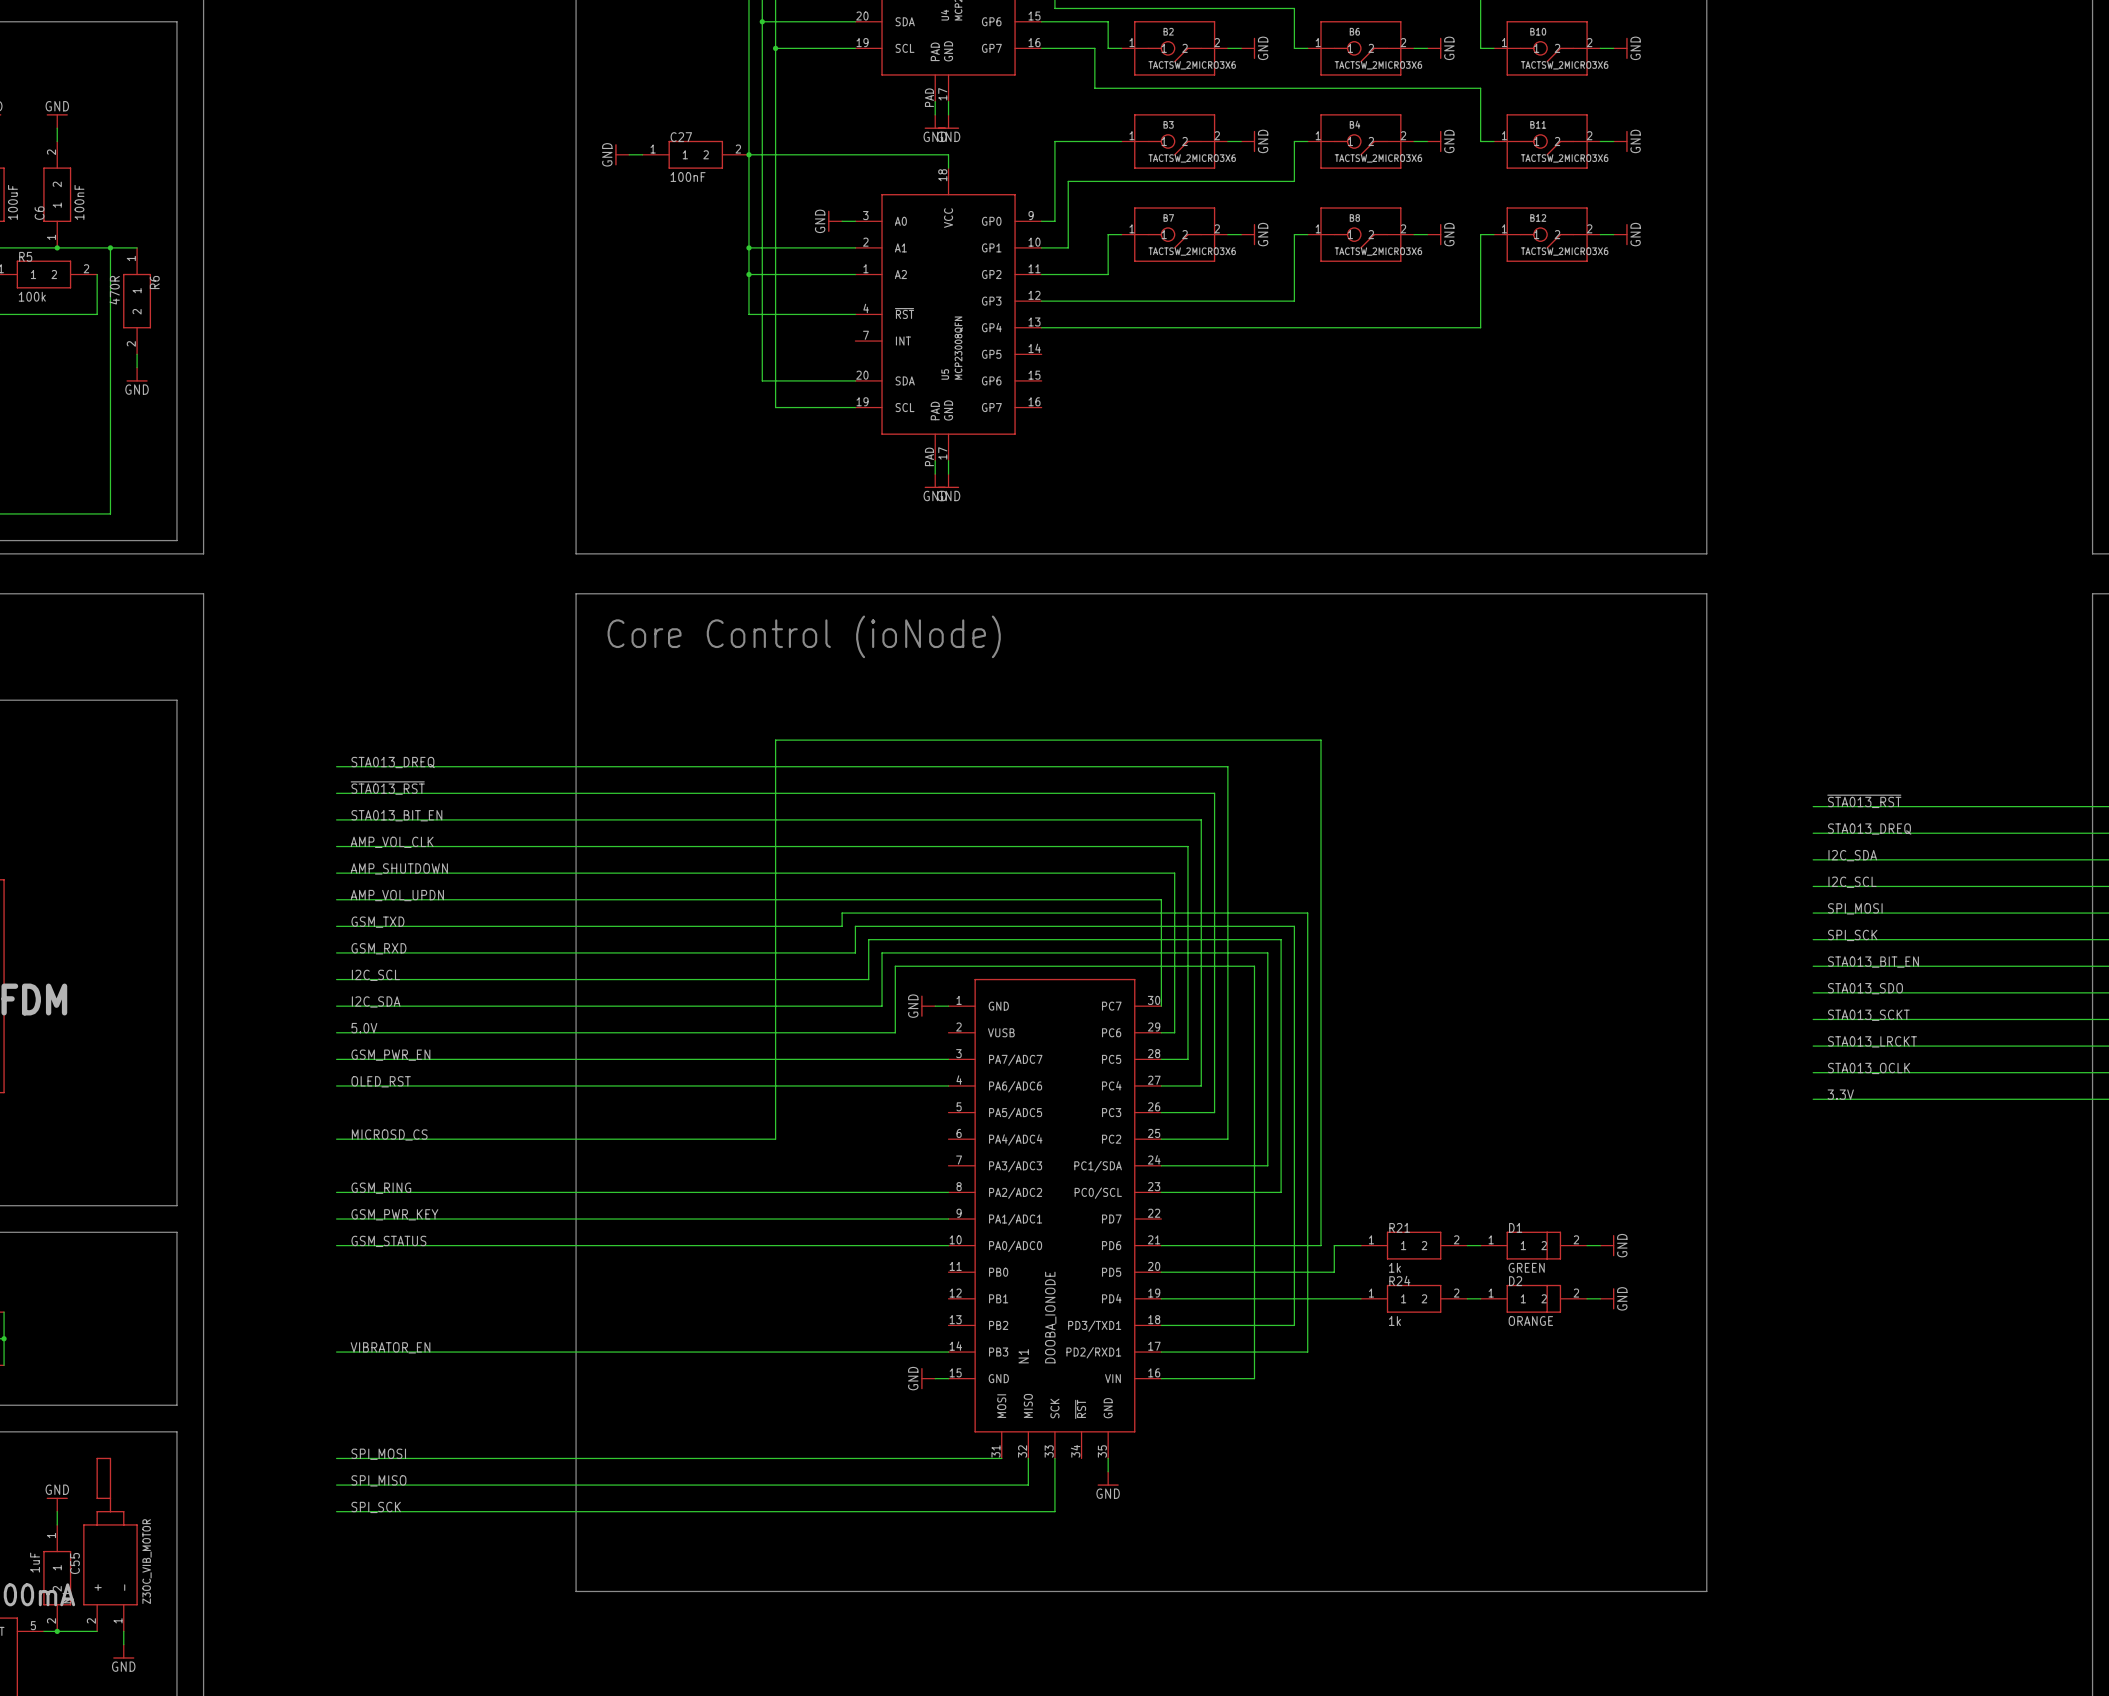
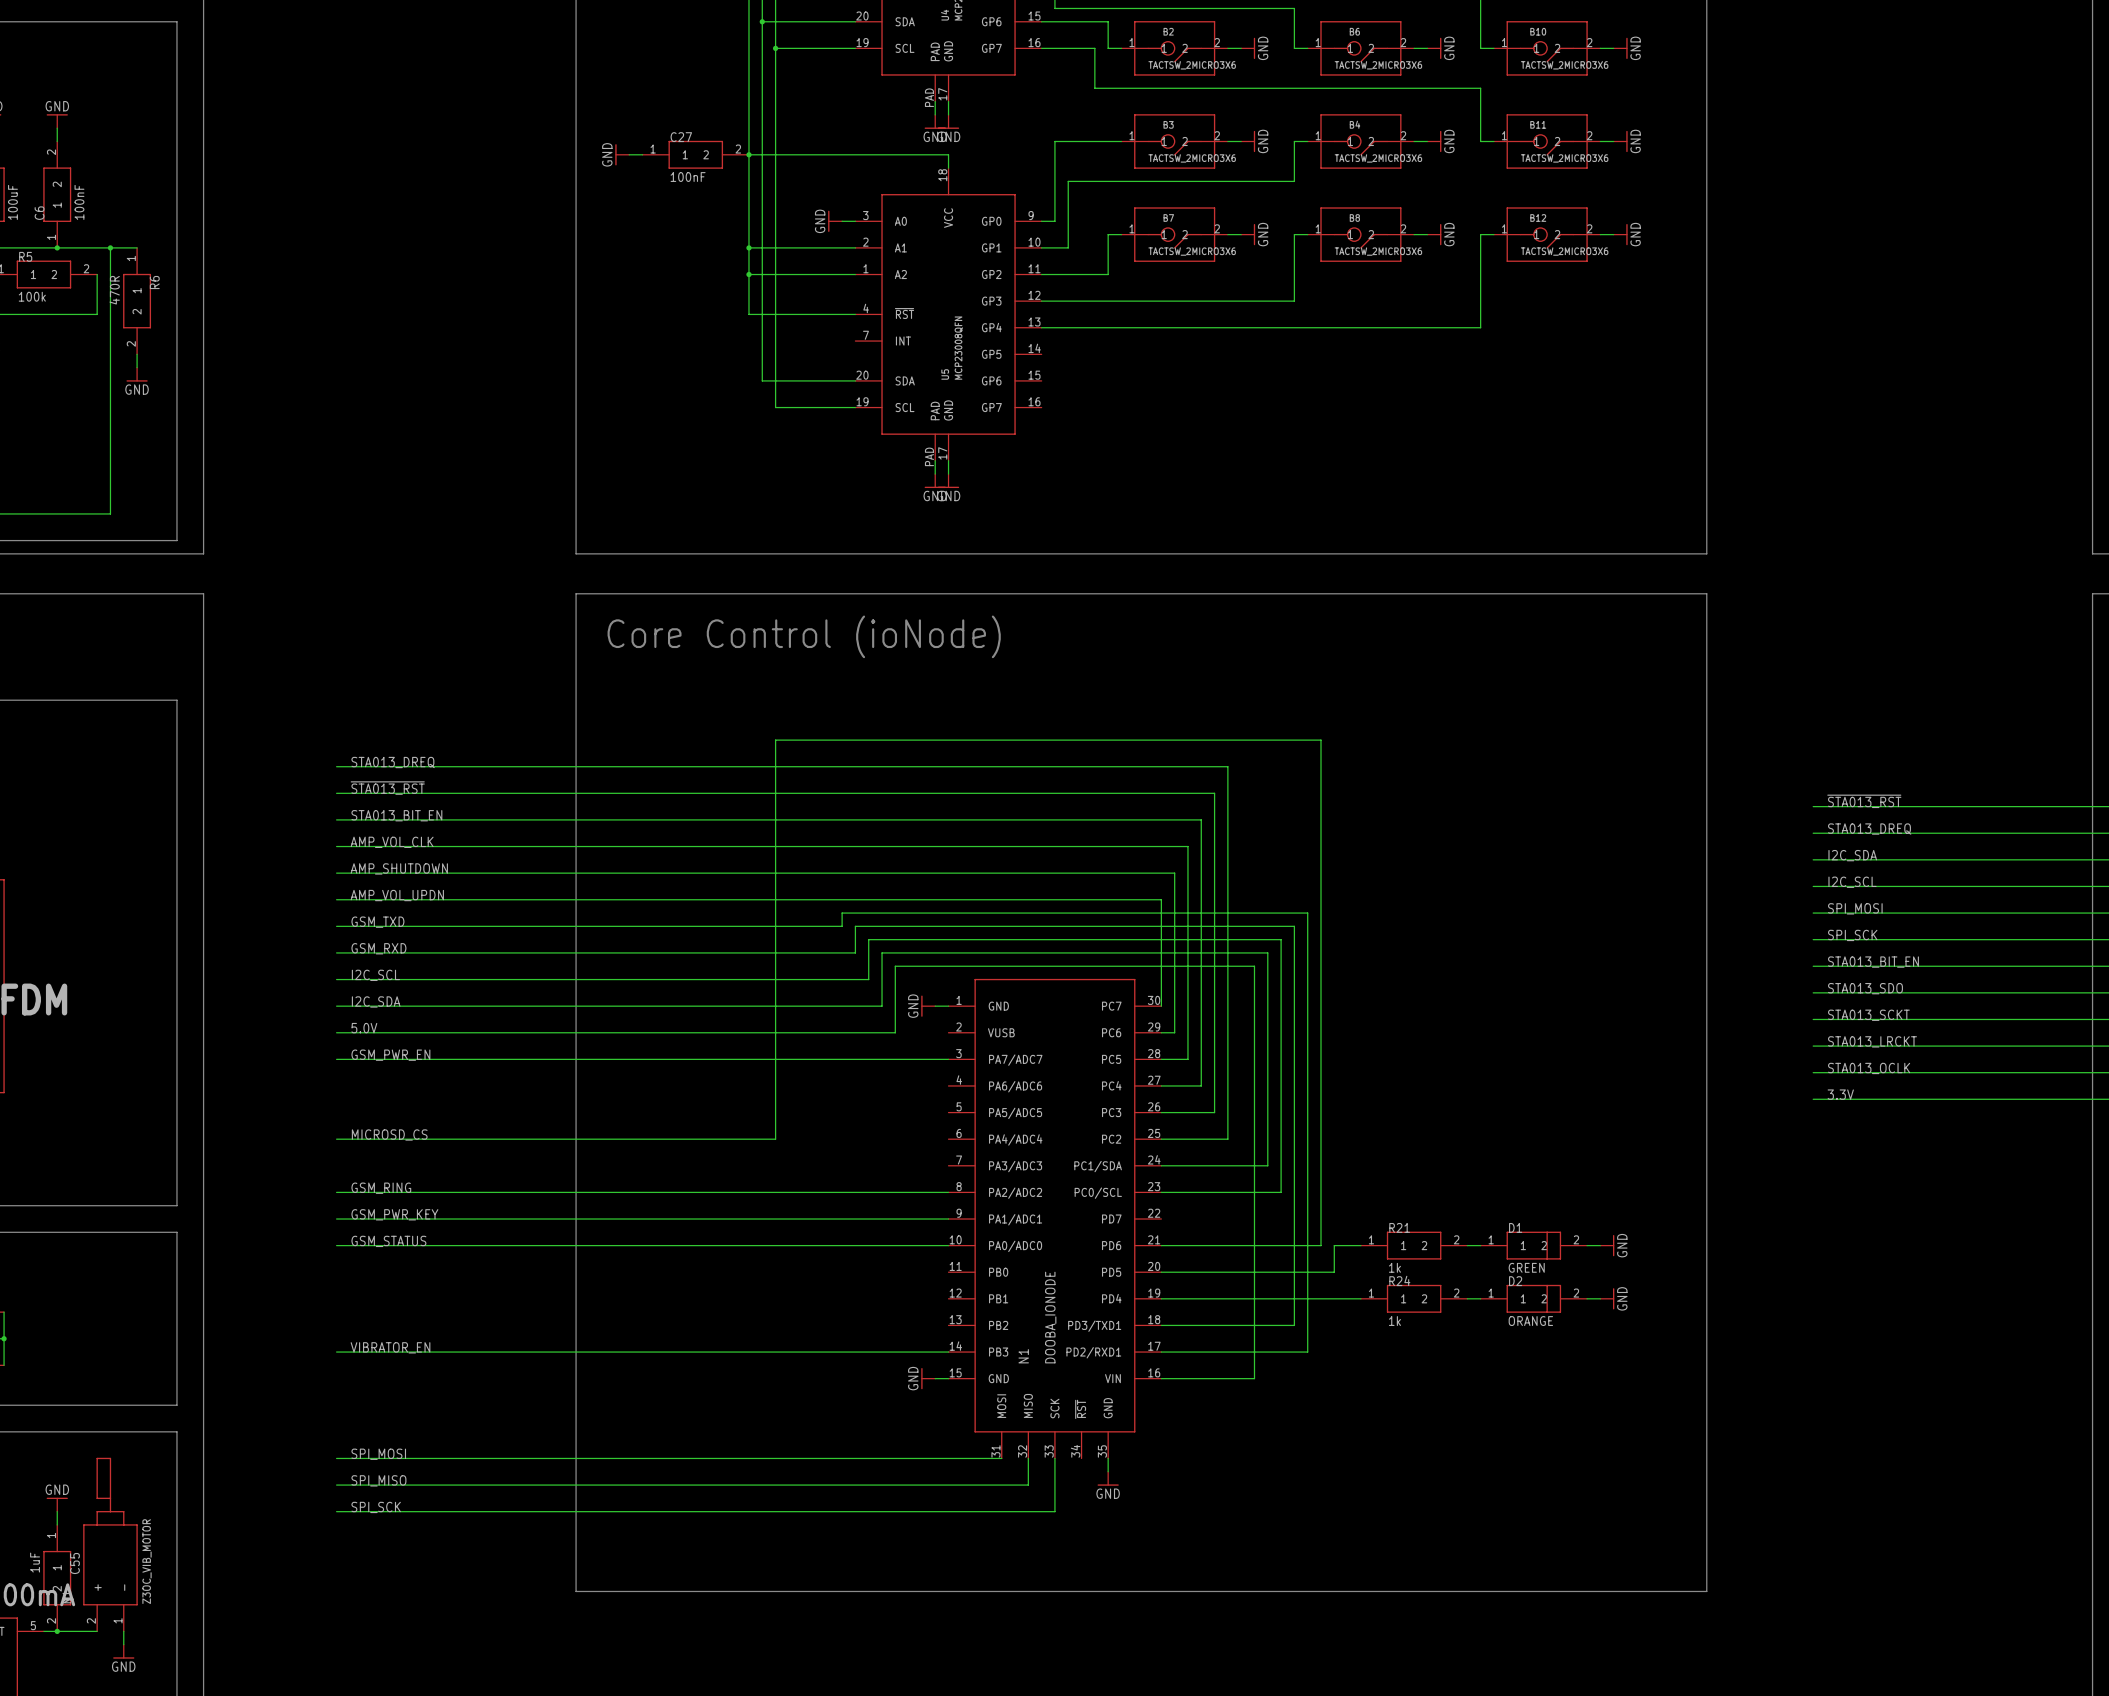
label: OLED_RST (381, 1081) -> none
wire: (336, 1085) (948, 1085) -> none

